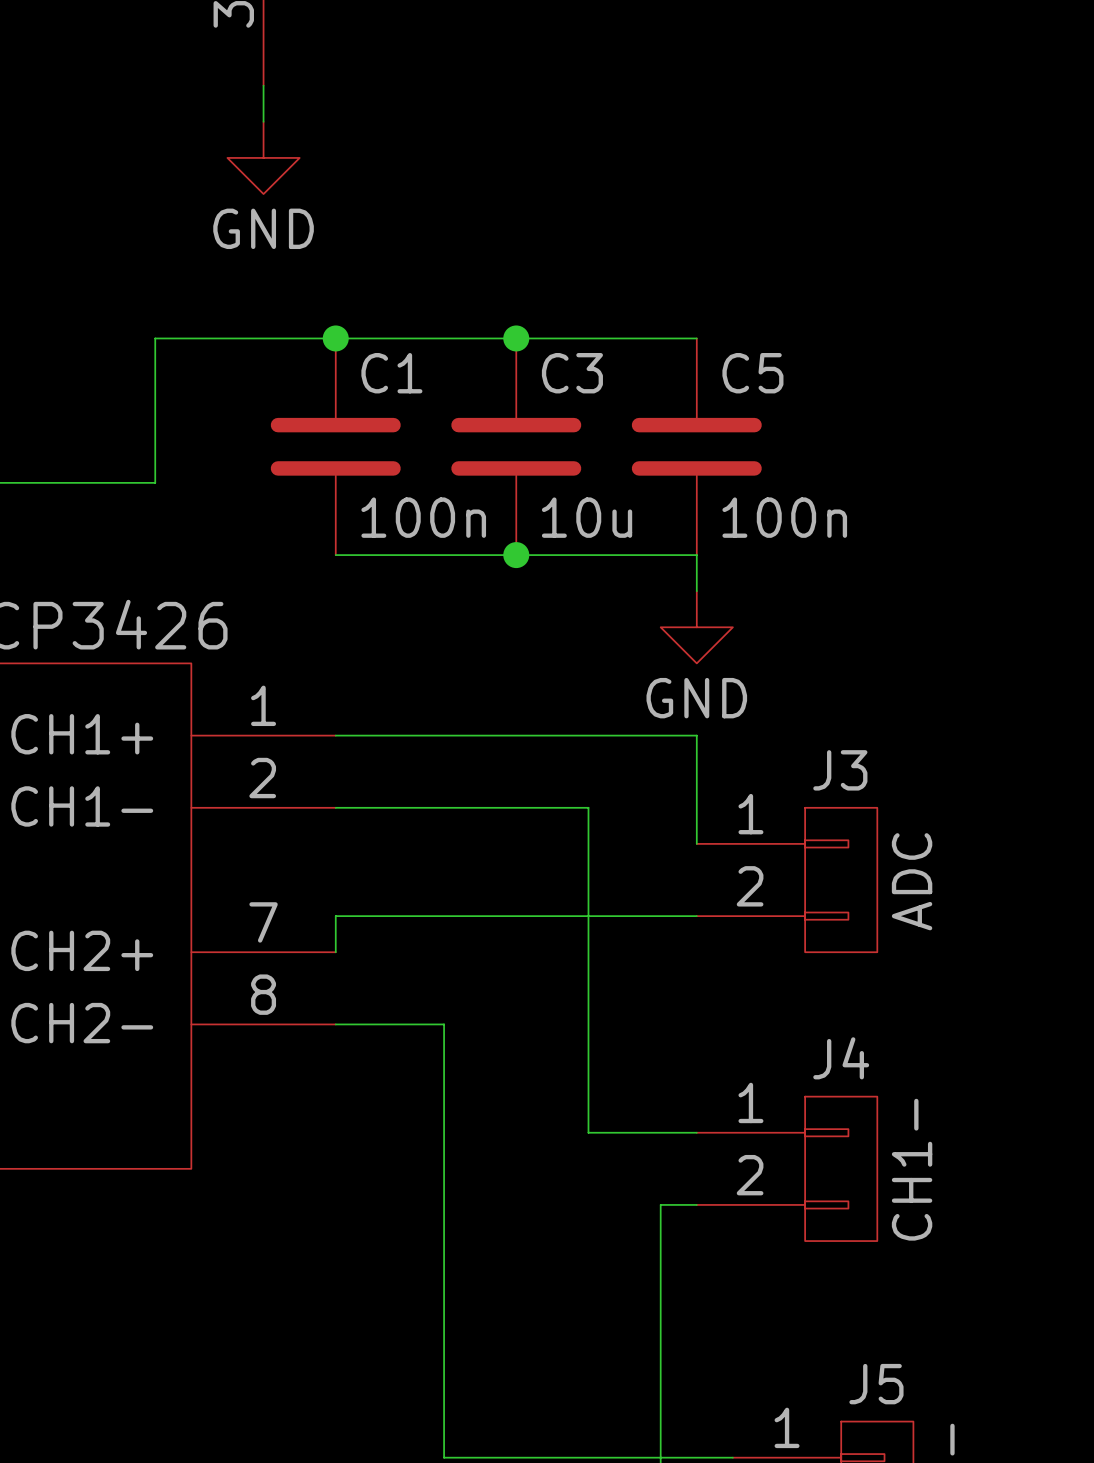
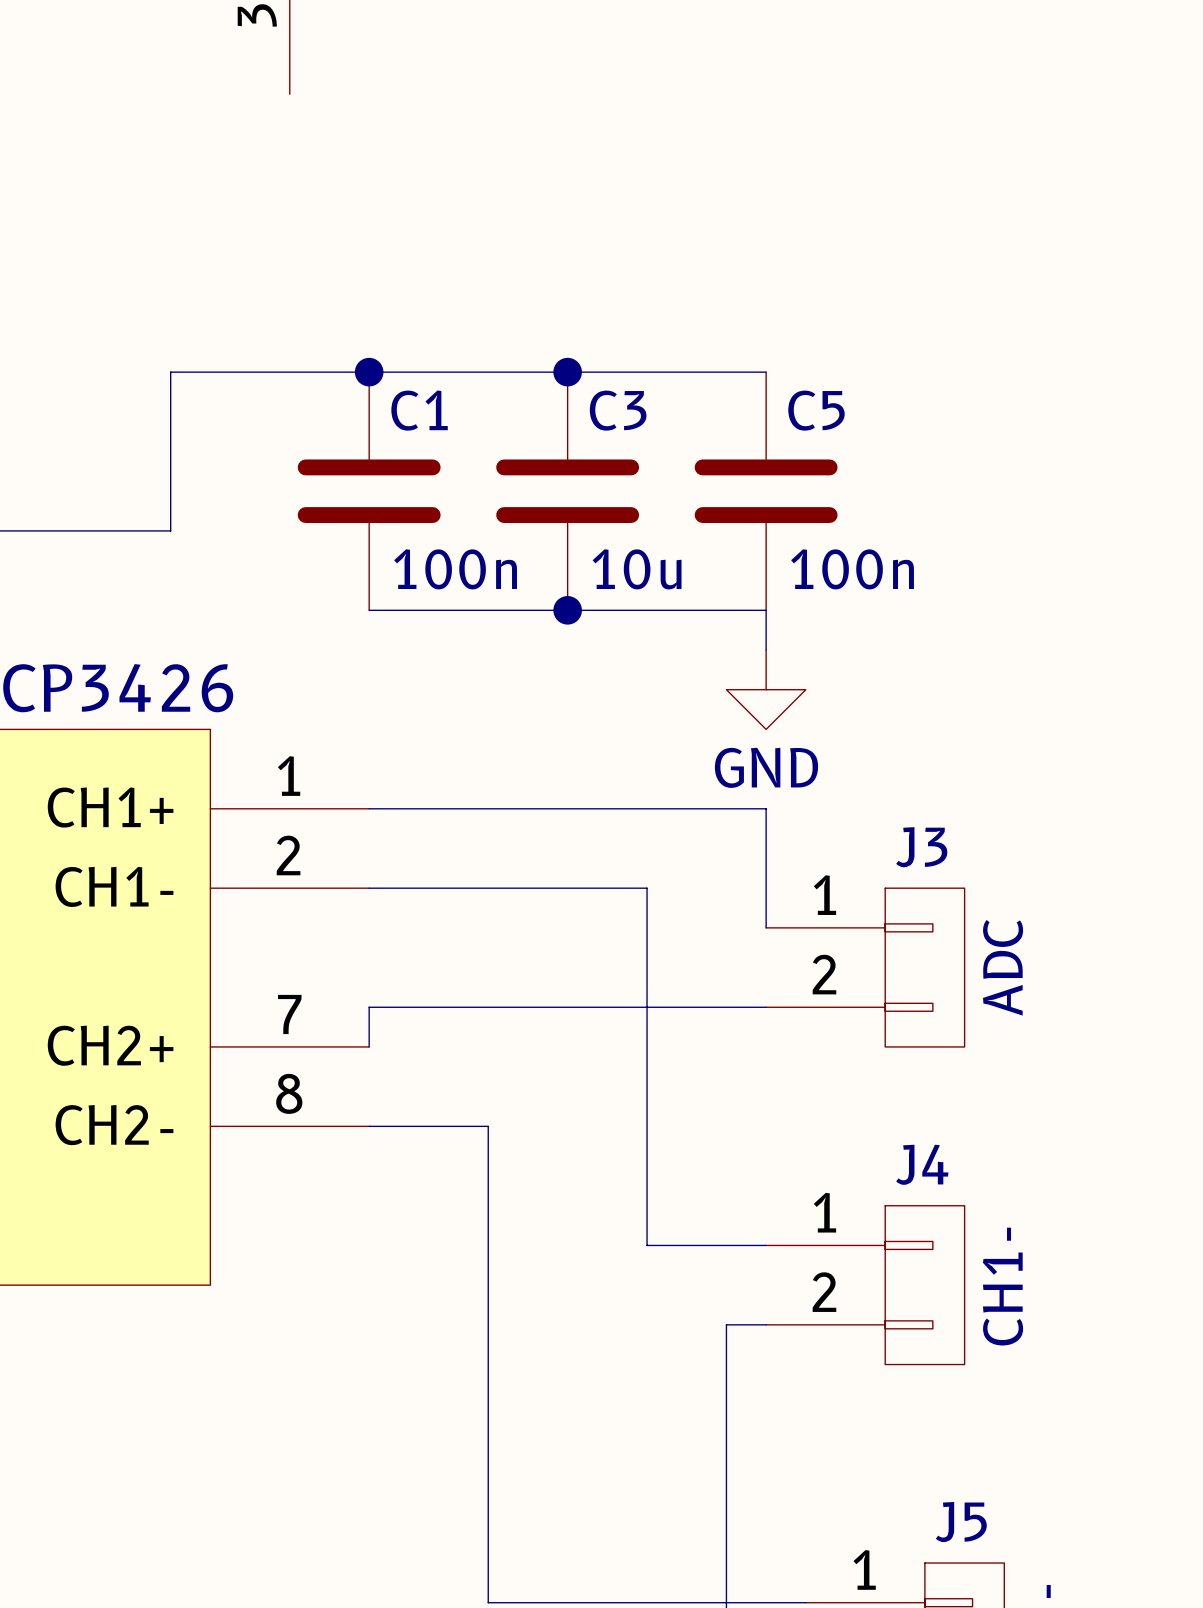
wire: (263, 85) (263, 121) -> none
power symbol: GND (263, 157) -> none

